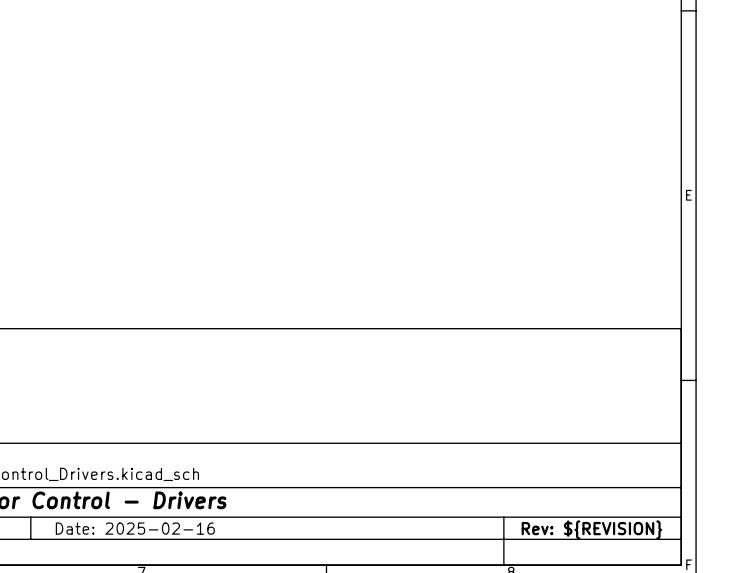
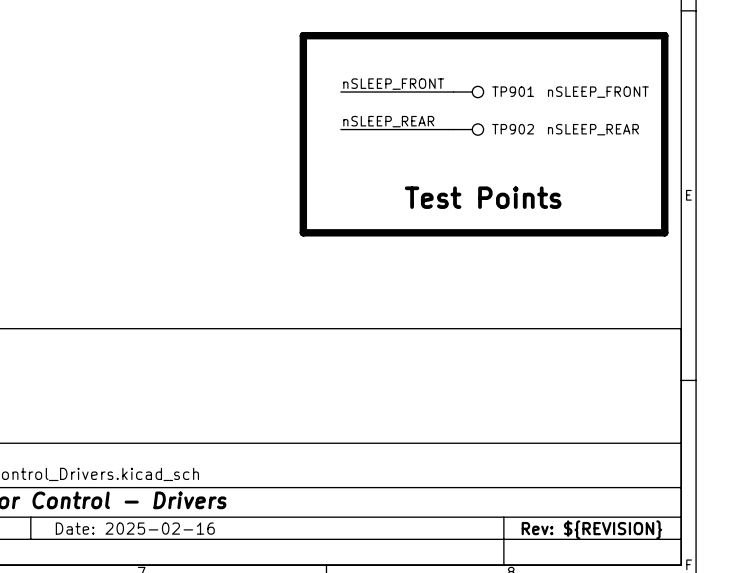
line: none -> (303, 35) (664, 35) (664, 232) (303, 232) (303, 35)
label: none -> nSLEEP_FRONT (393, 84)
wire: none -> (340, 92) (453, 92)
TP901: none -> nSLEEP_FRONT (468, 92)
label: none -> nSLEEP_REAR (388, 121)
wire: none -> (340, 129) (453, 129)
TP902: none -> nSLEEP_REAR (468, 129)
text: none -> Test Points (483, 197)

